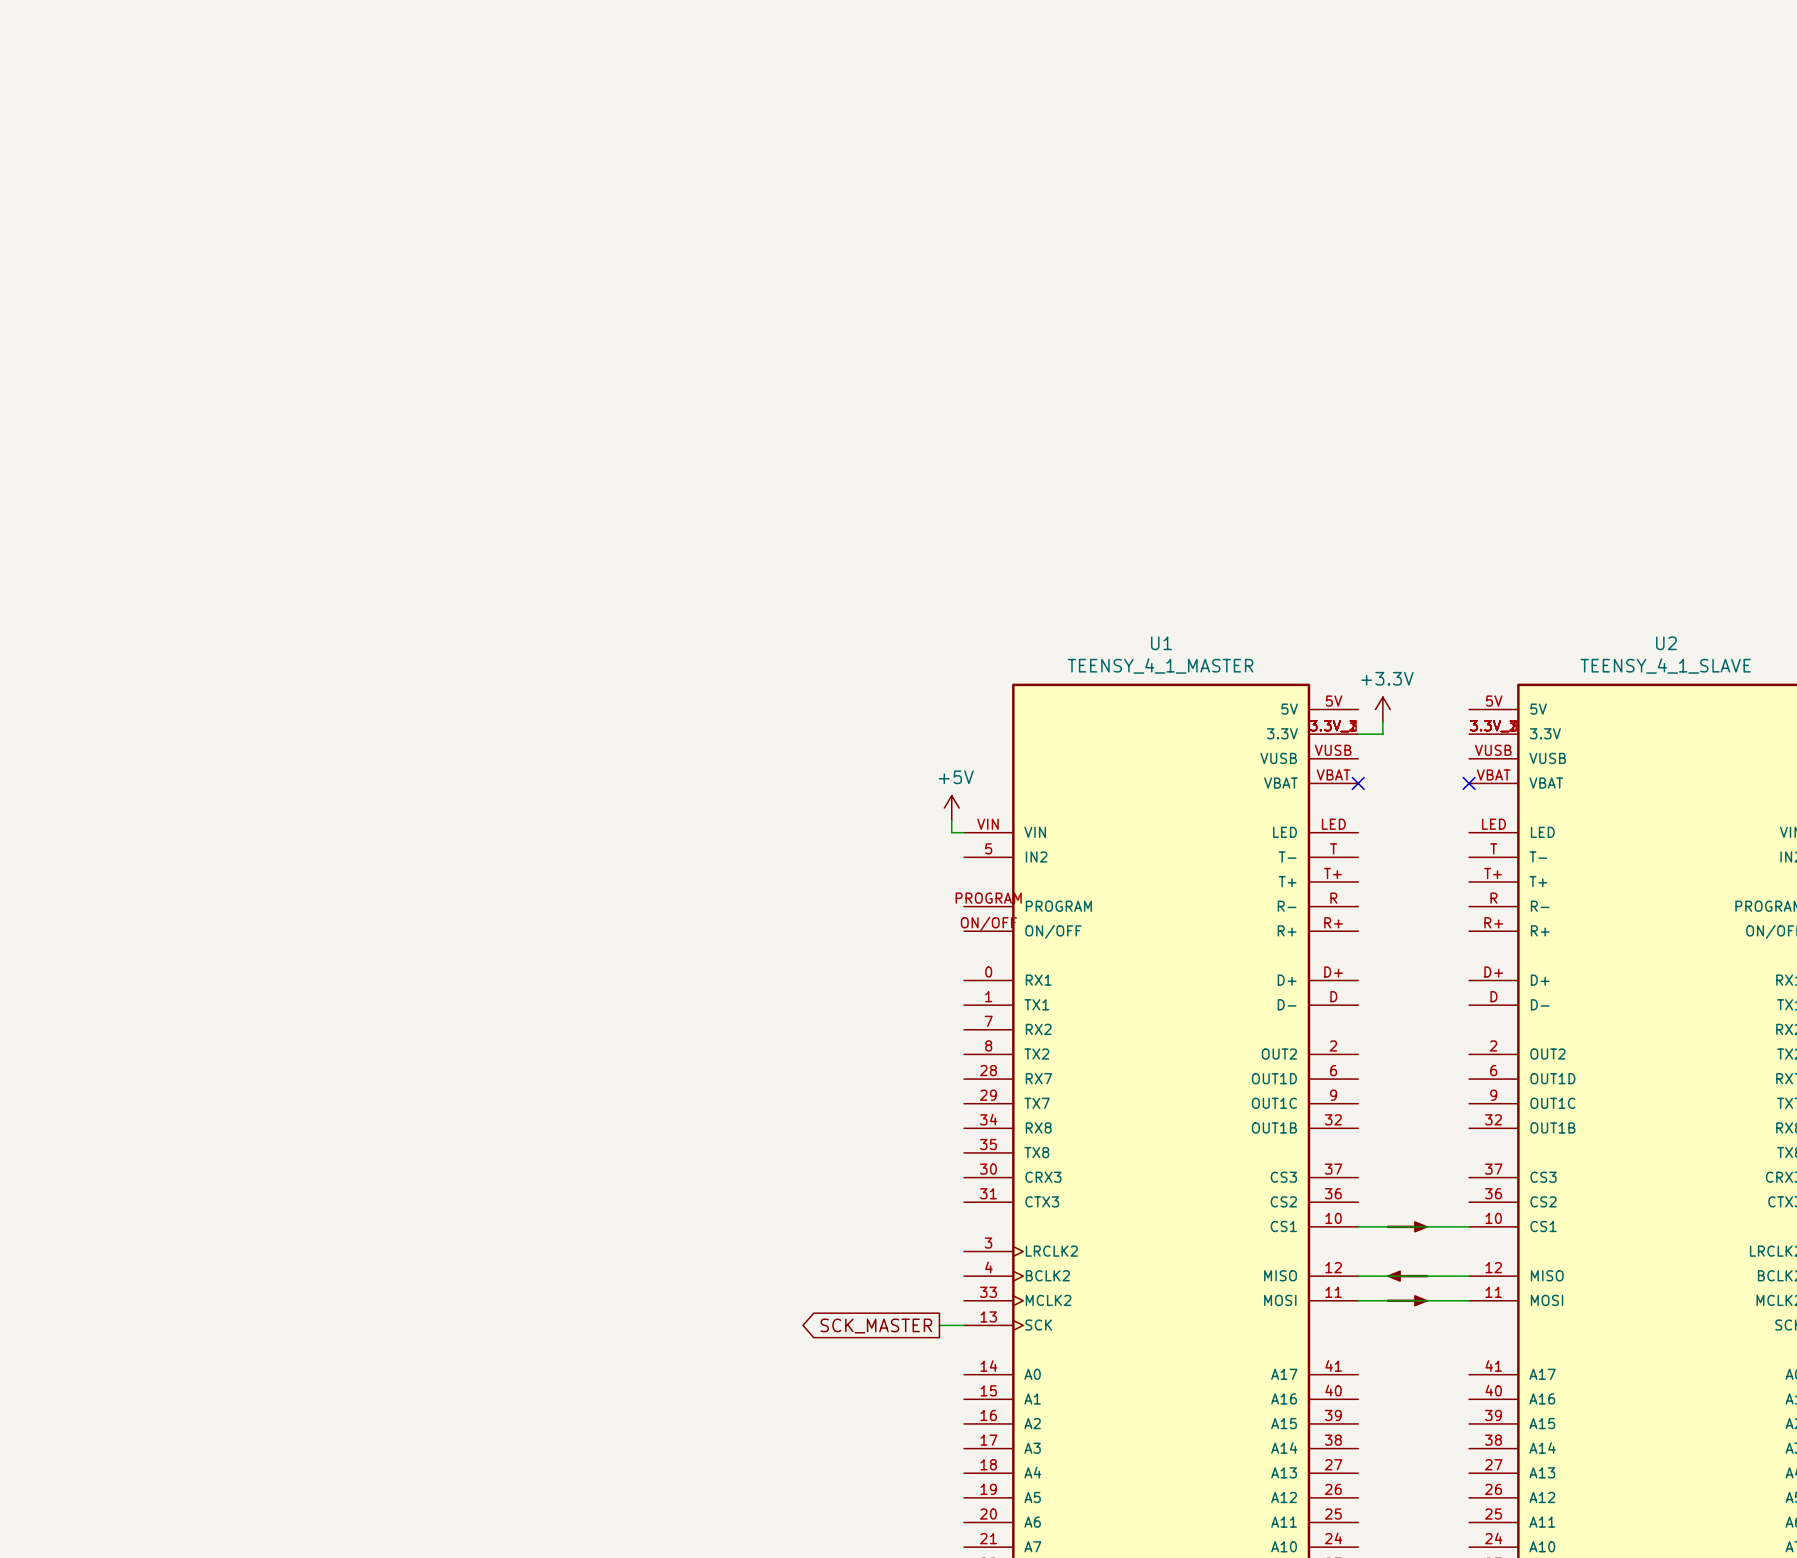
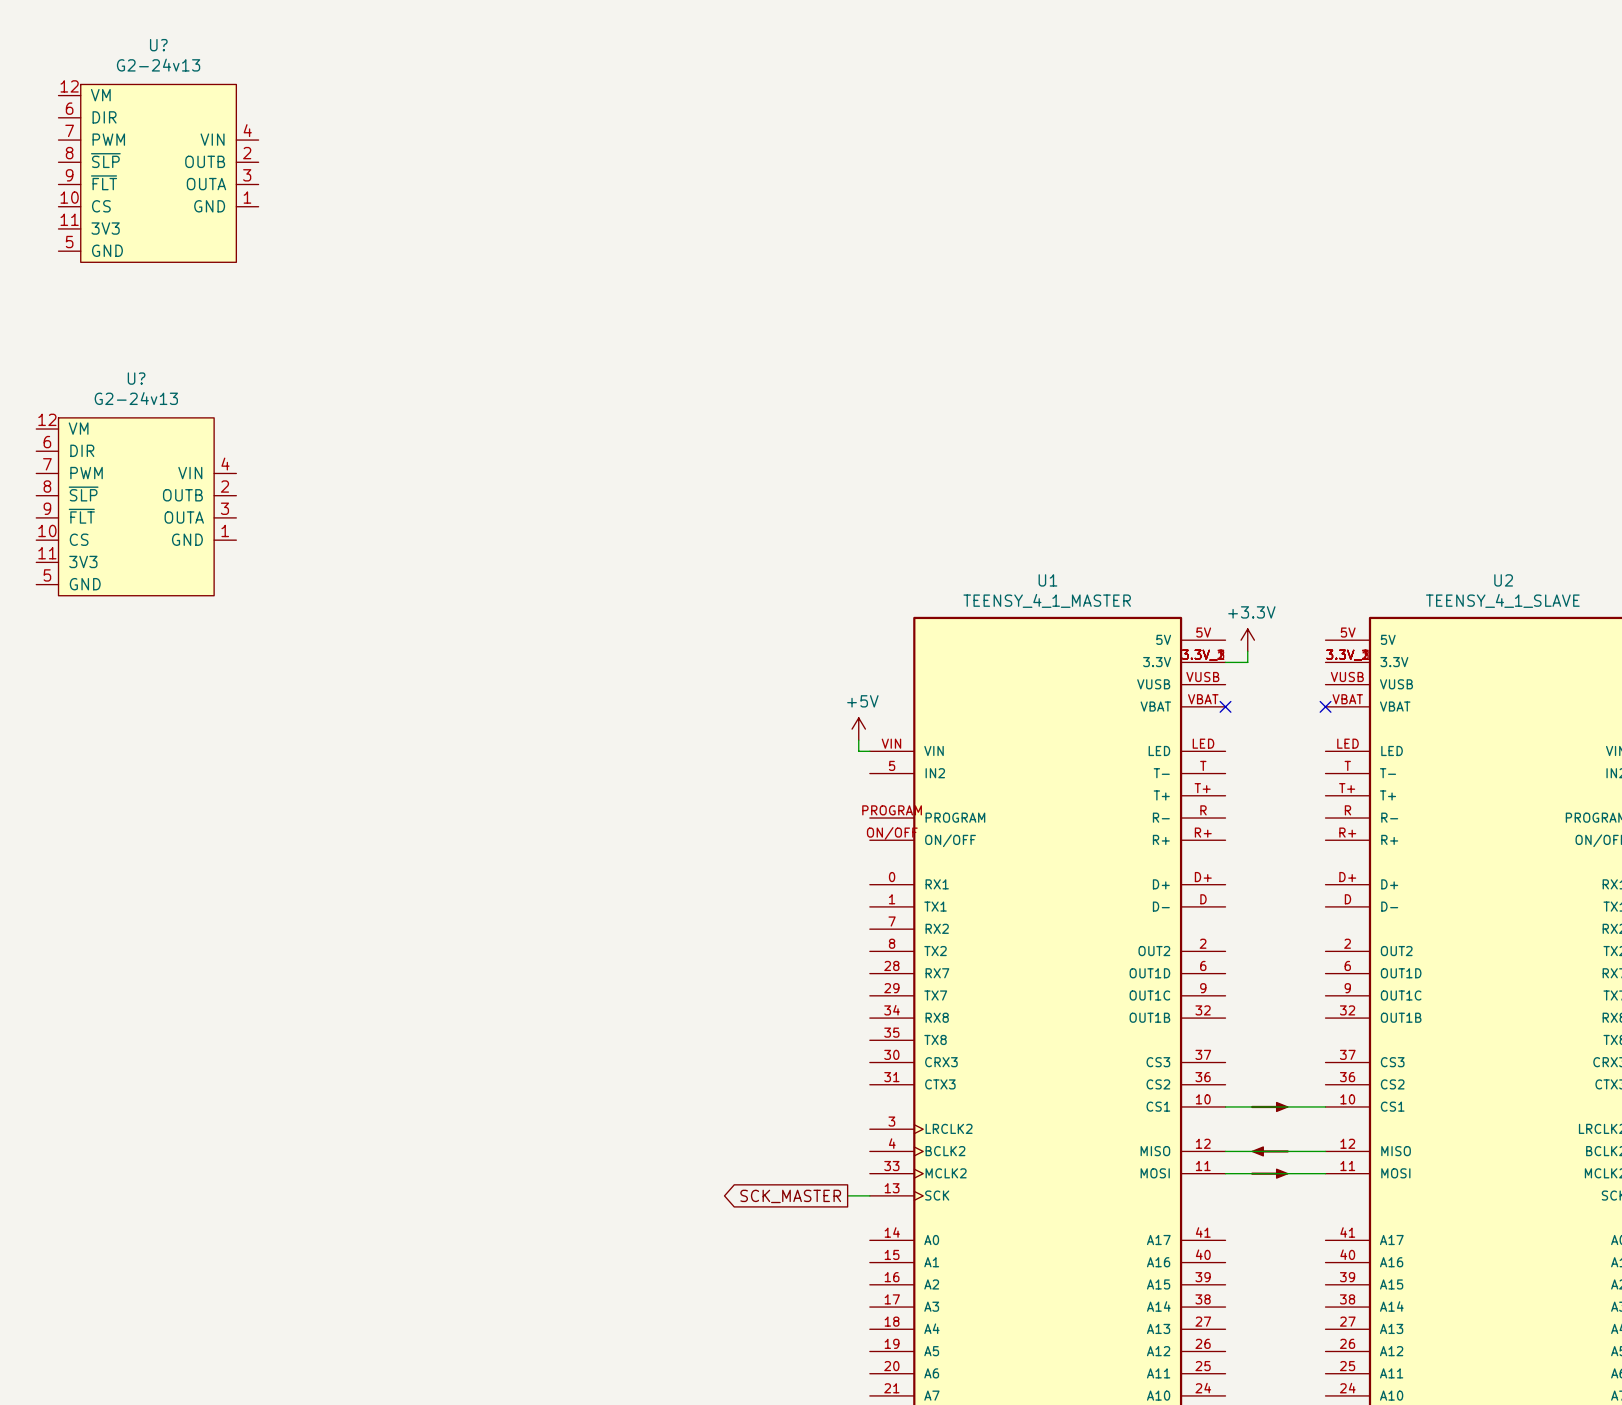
U?: none -> G2-24v13 (158, 173)
U?: none -> G2-24v13 (136, 506)

